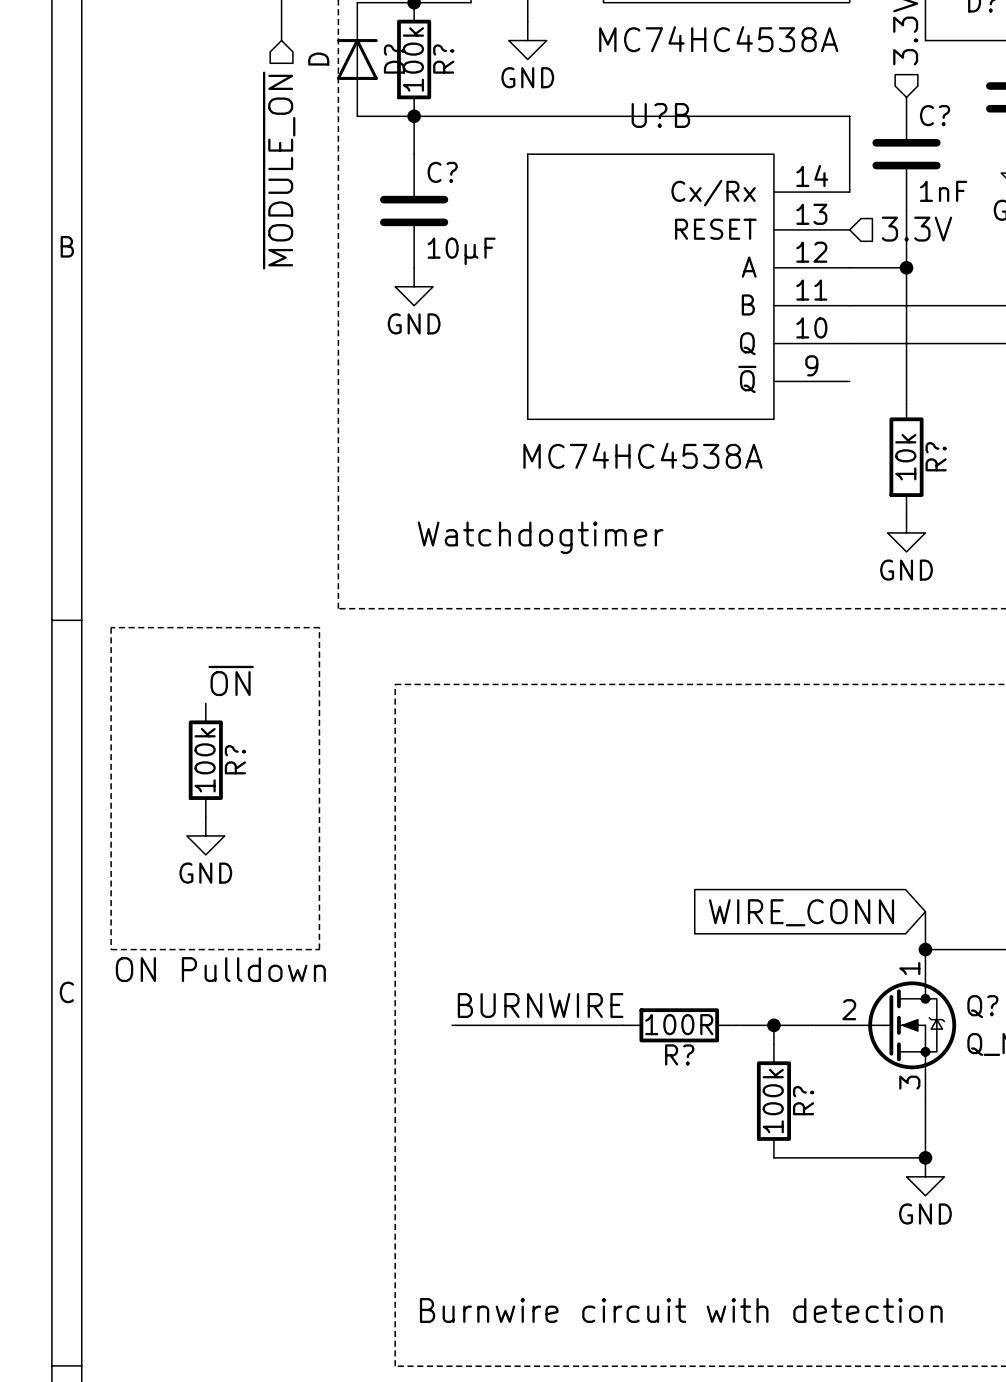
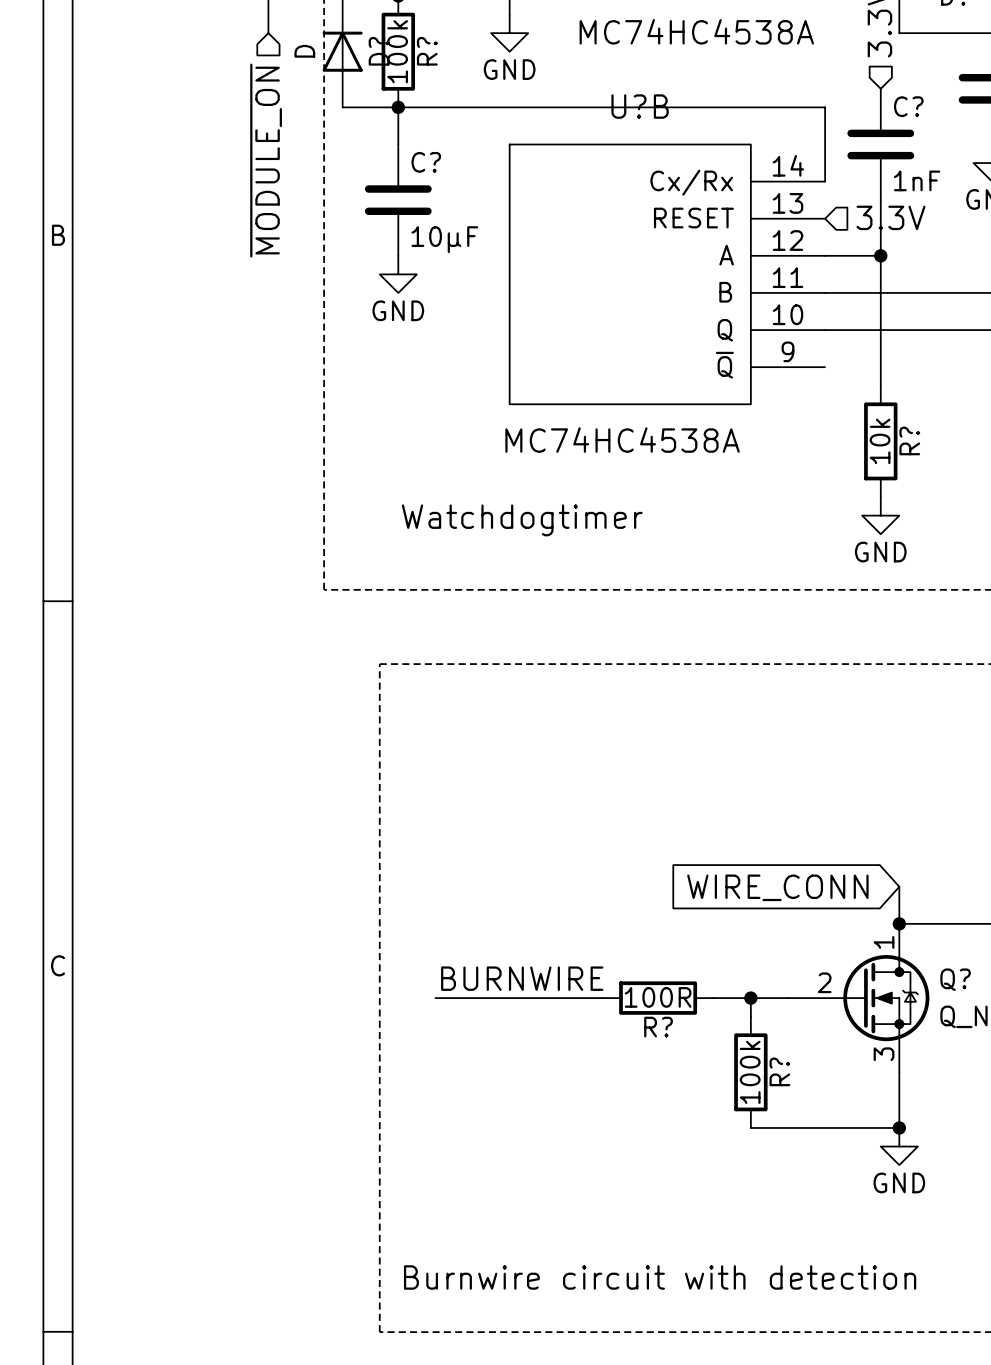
line: (111, 627) (111, 949) (319, 949) (319, 627) (111, 627) -> none
label: ~{ON} (231, 680) -> none
R?: 100k (205, 760) -> none
power symbol: GND (205, 835) -> none
text: ON Pulldown (220, 969) -> none

